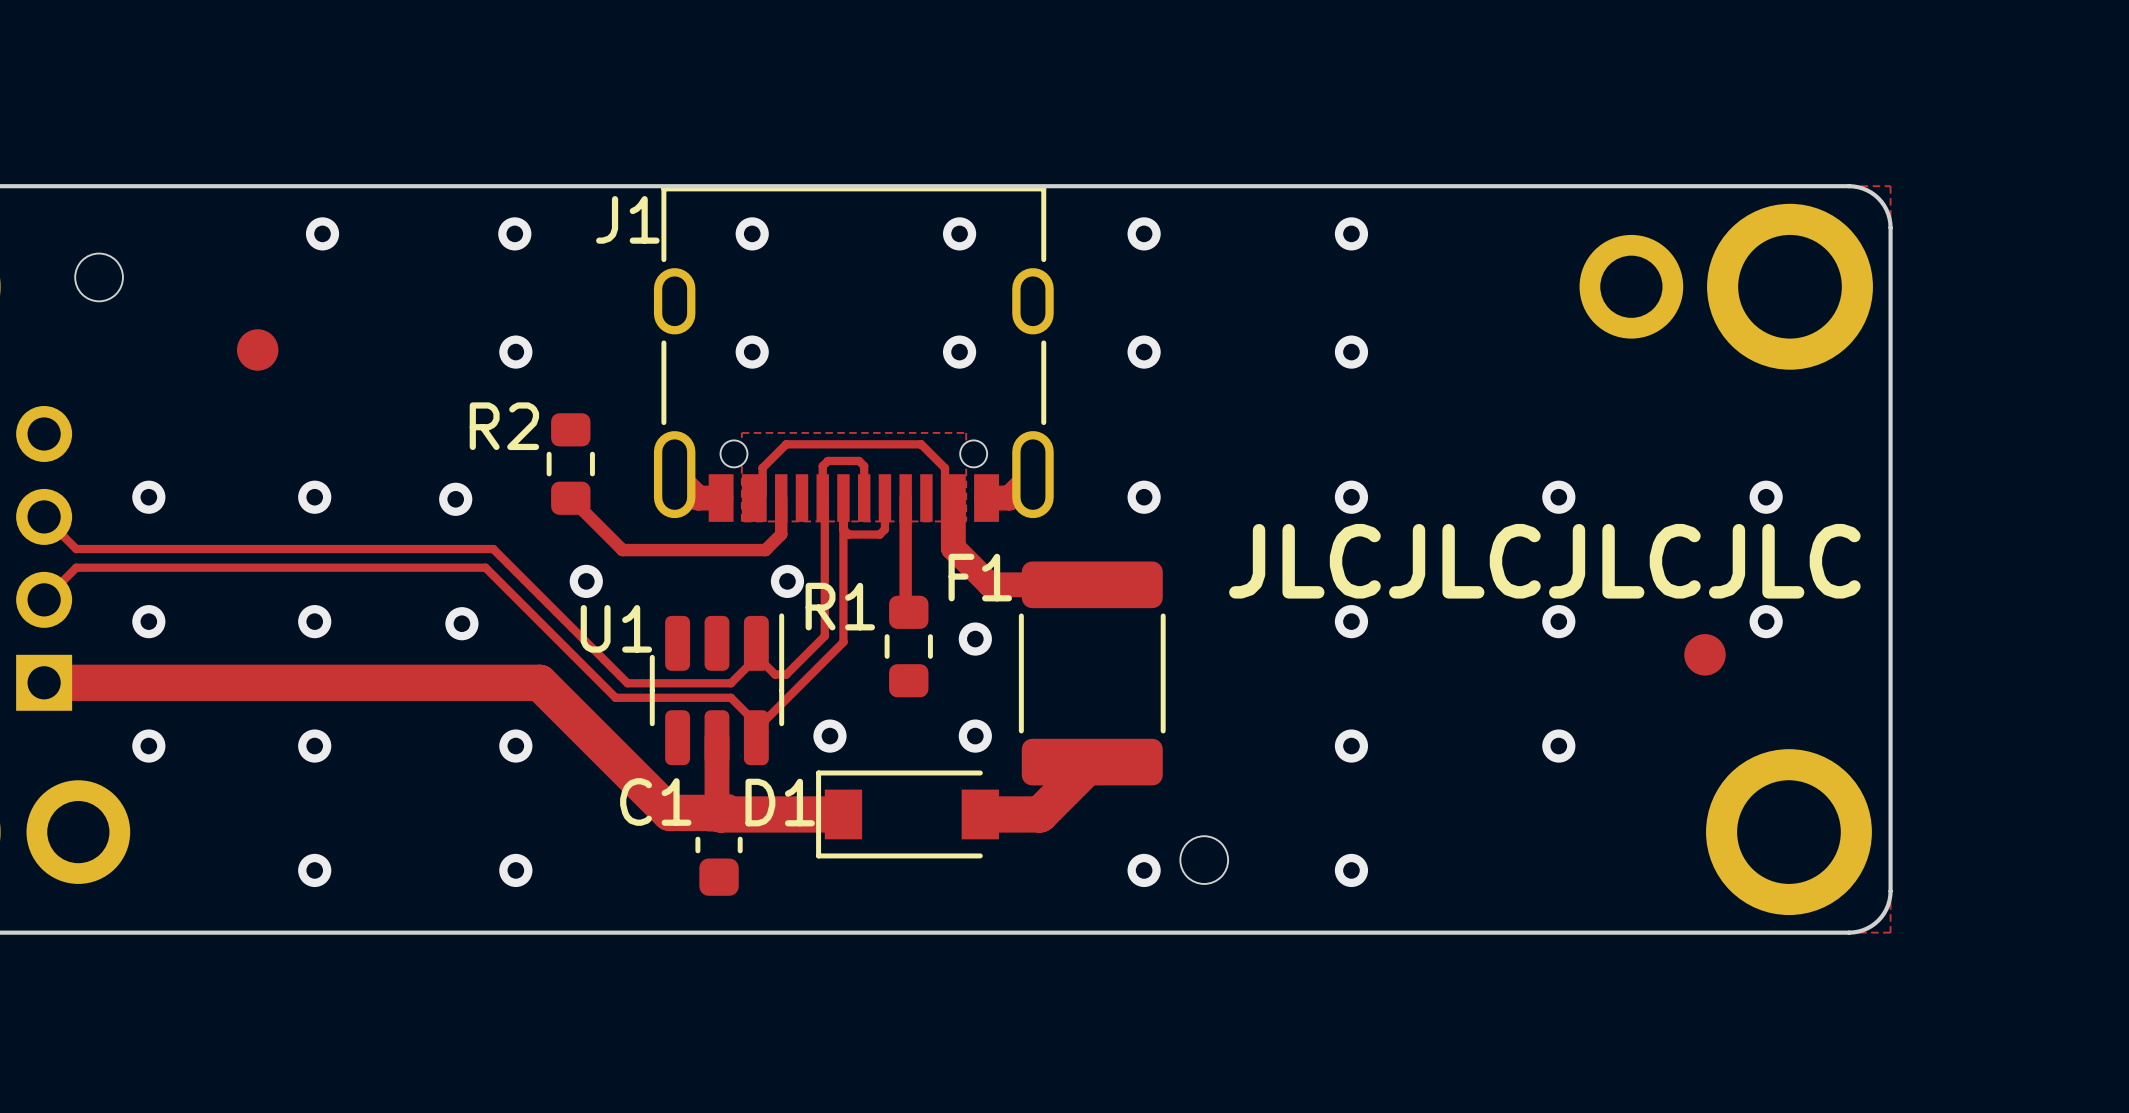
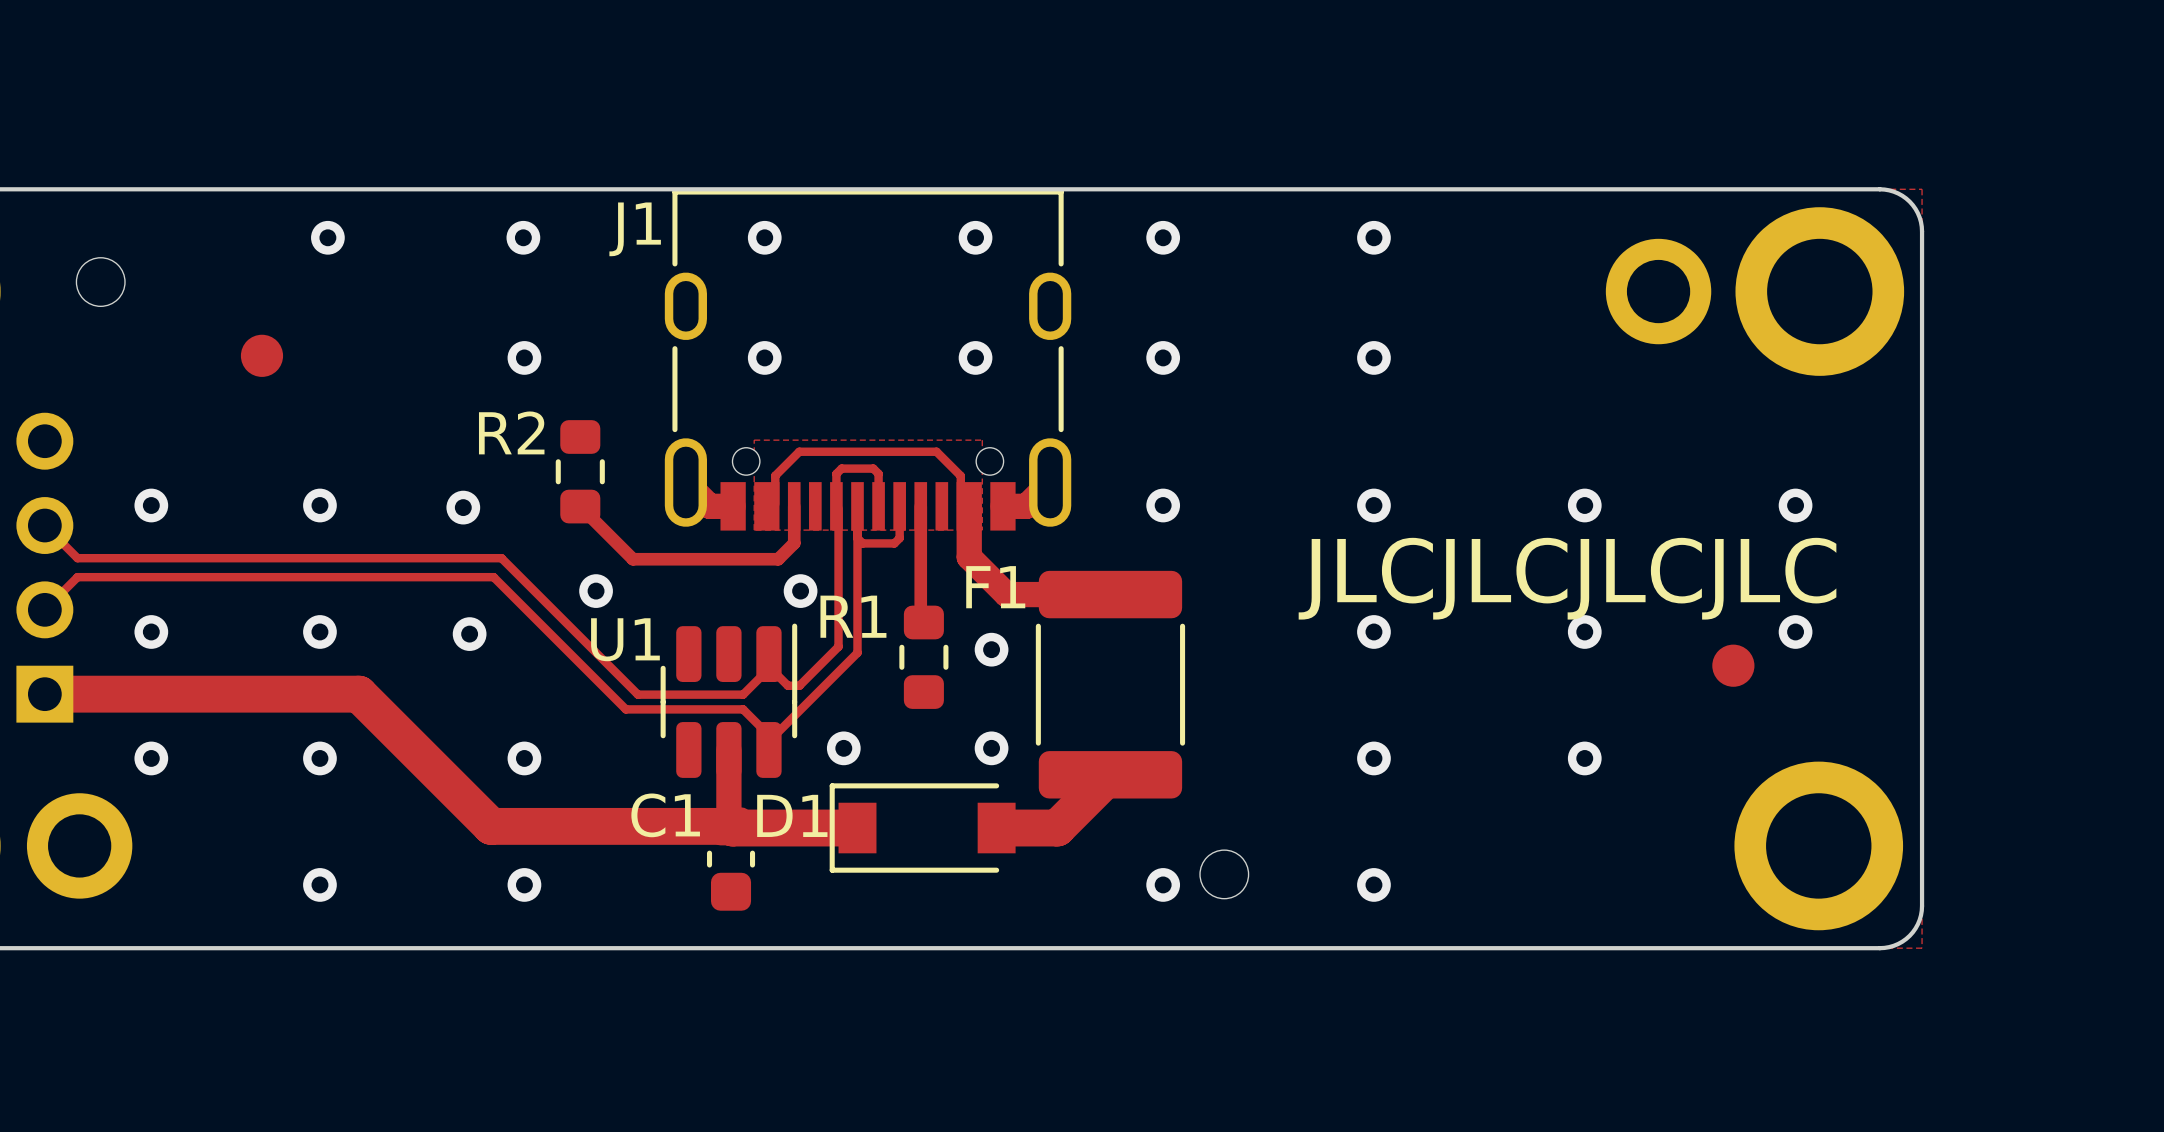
track: (353, 682) (539, 682) (669, 812) -> (358, 694) (491, 826) (680, 826)

